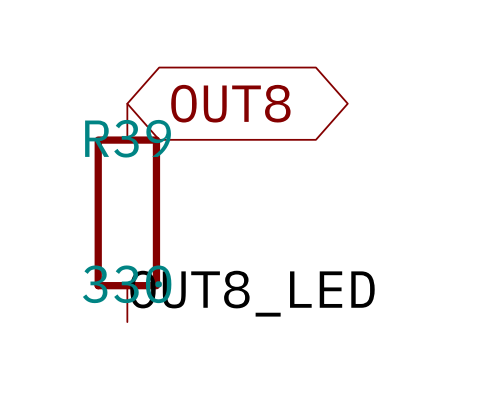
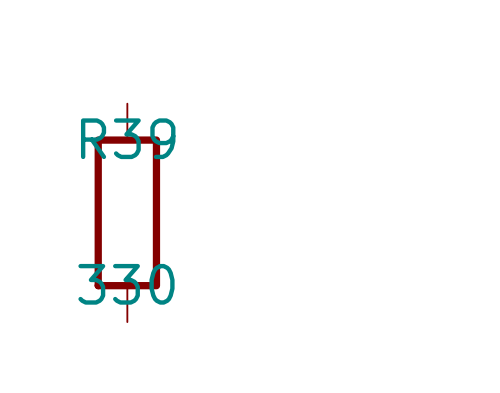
global label: OUT8 (230, 103) -> none
label: OUT8_LED (252, 293) -> none

